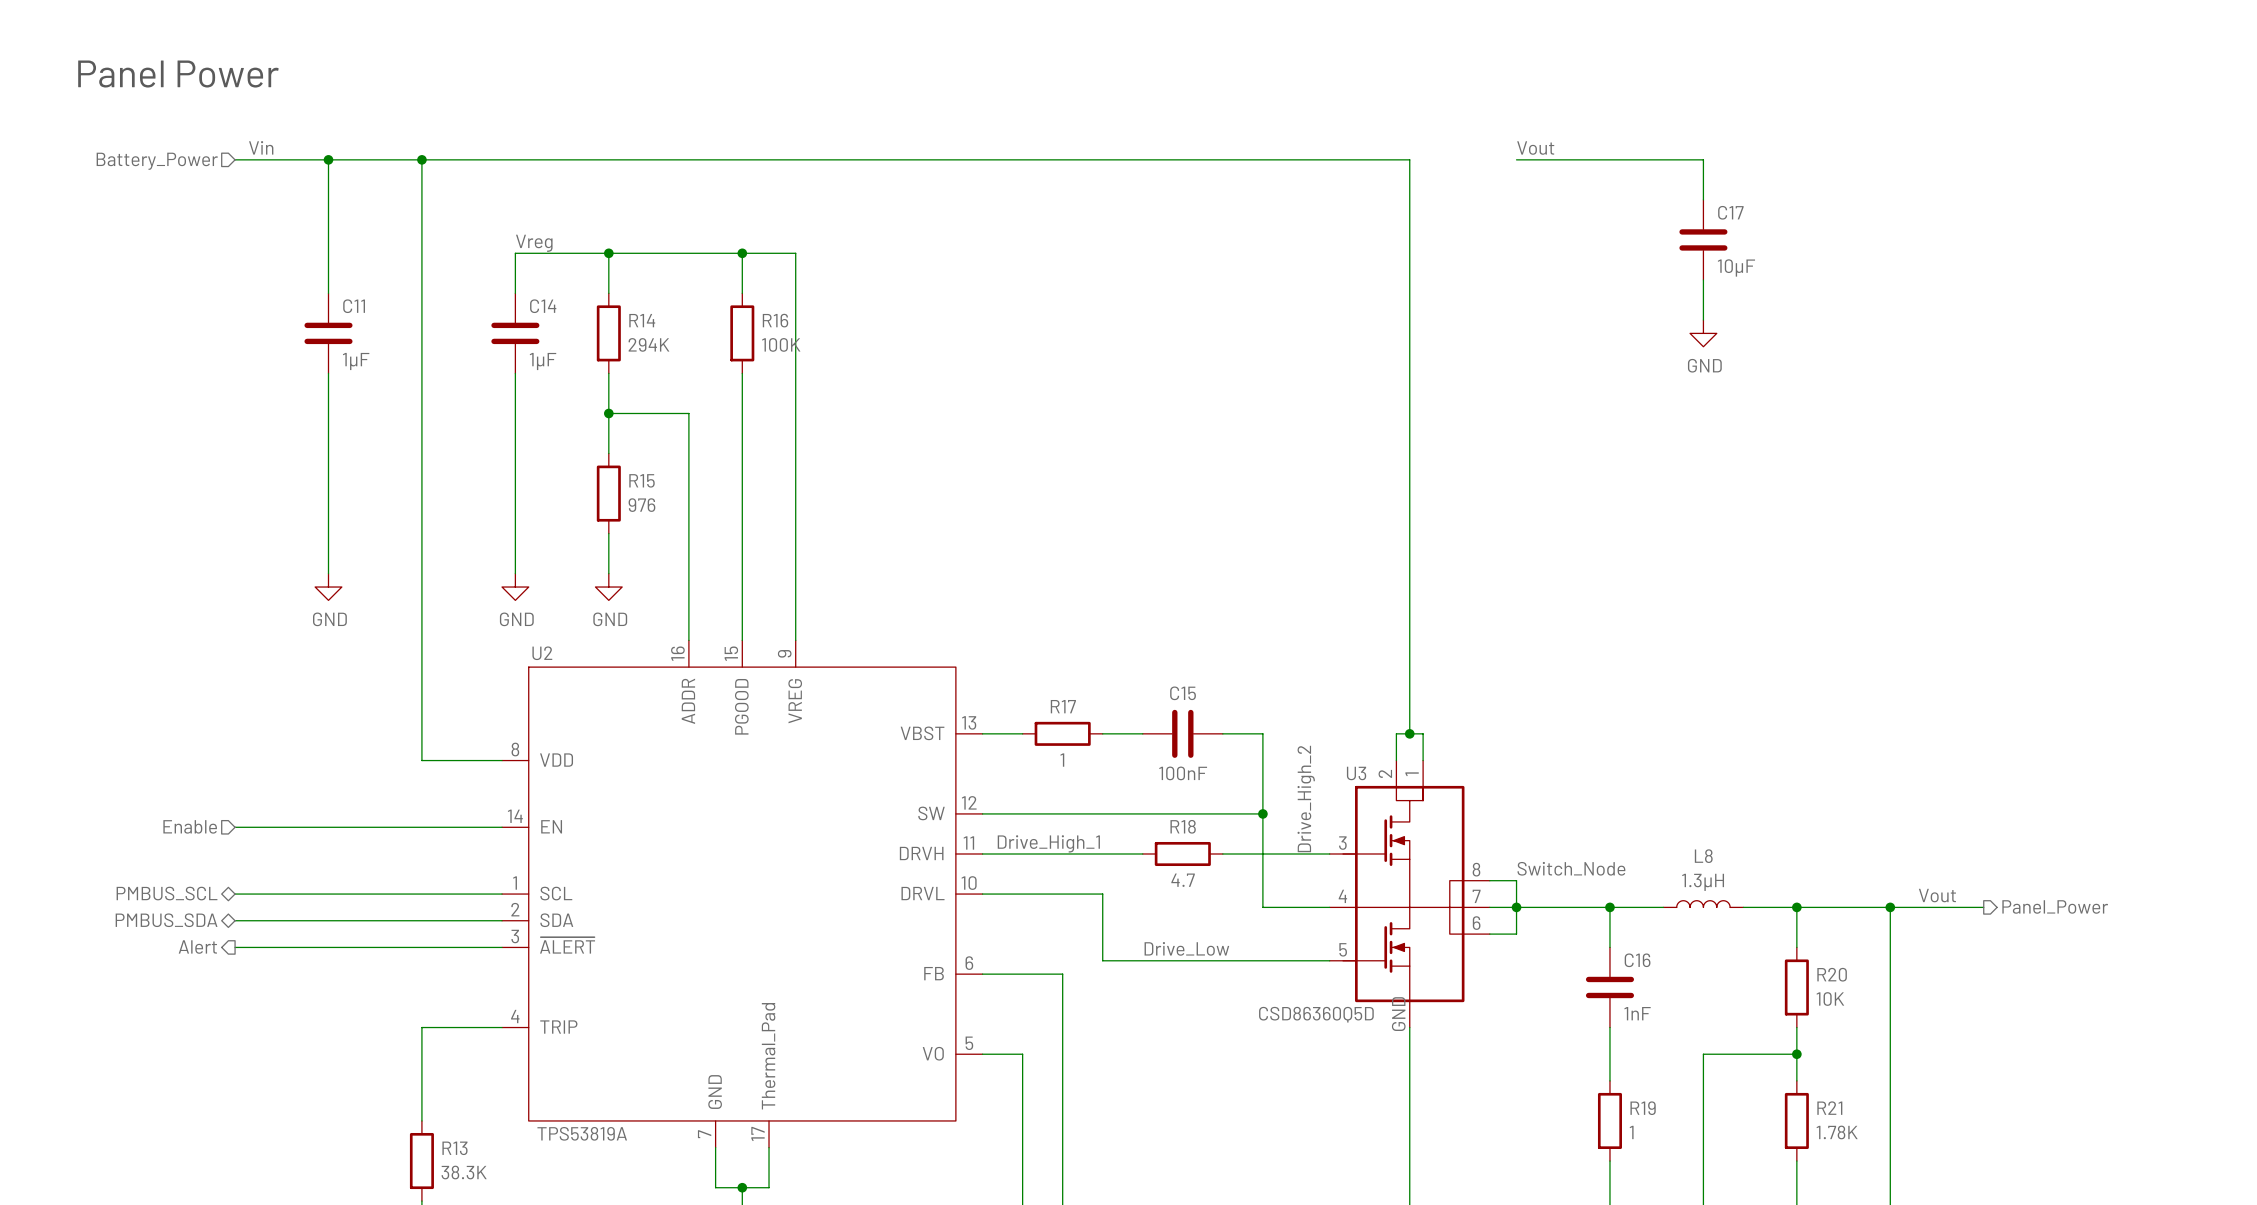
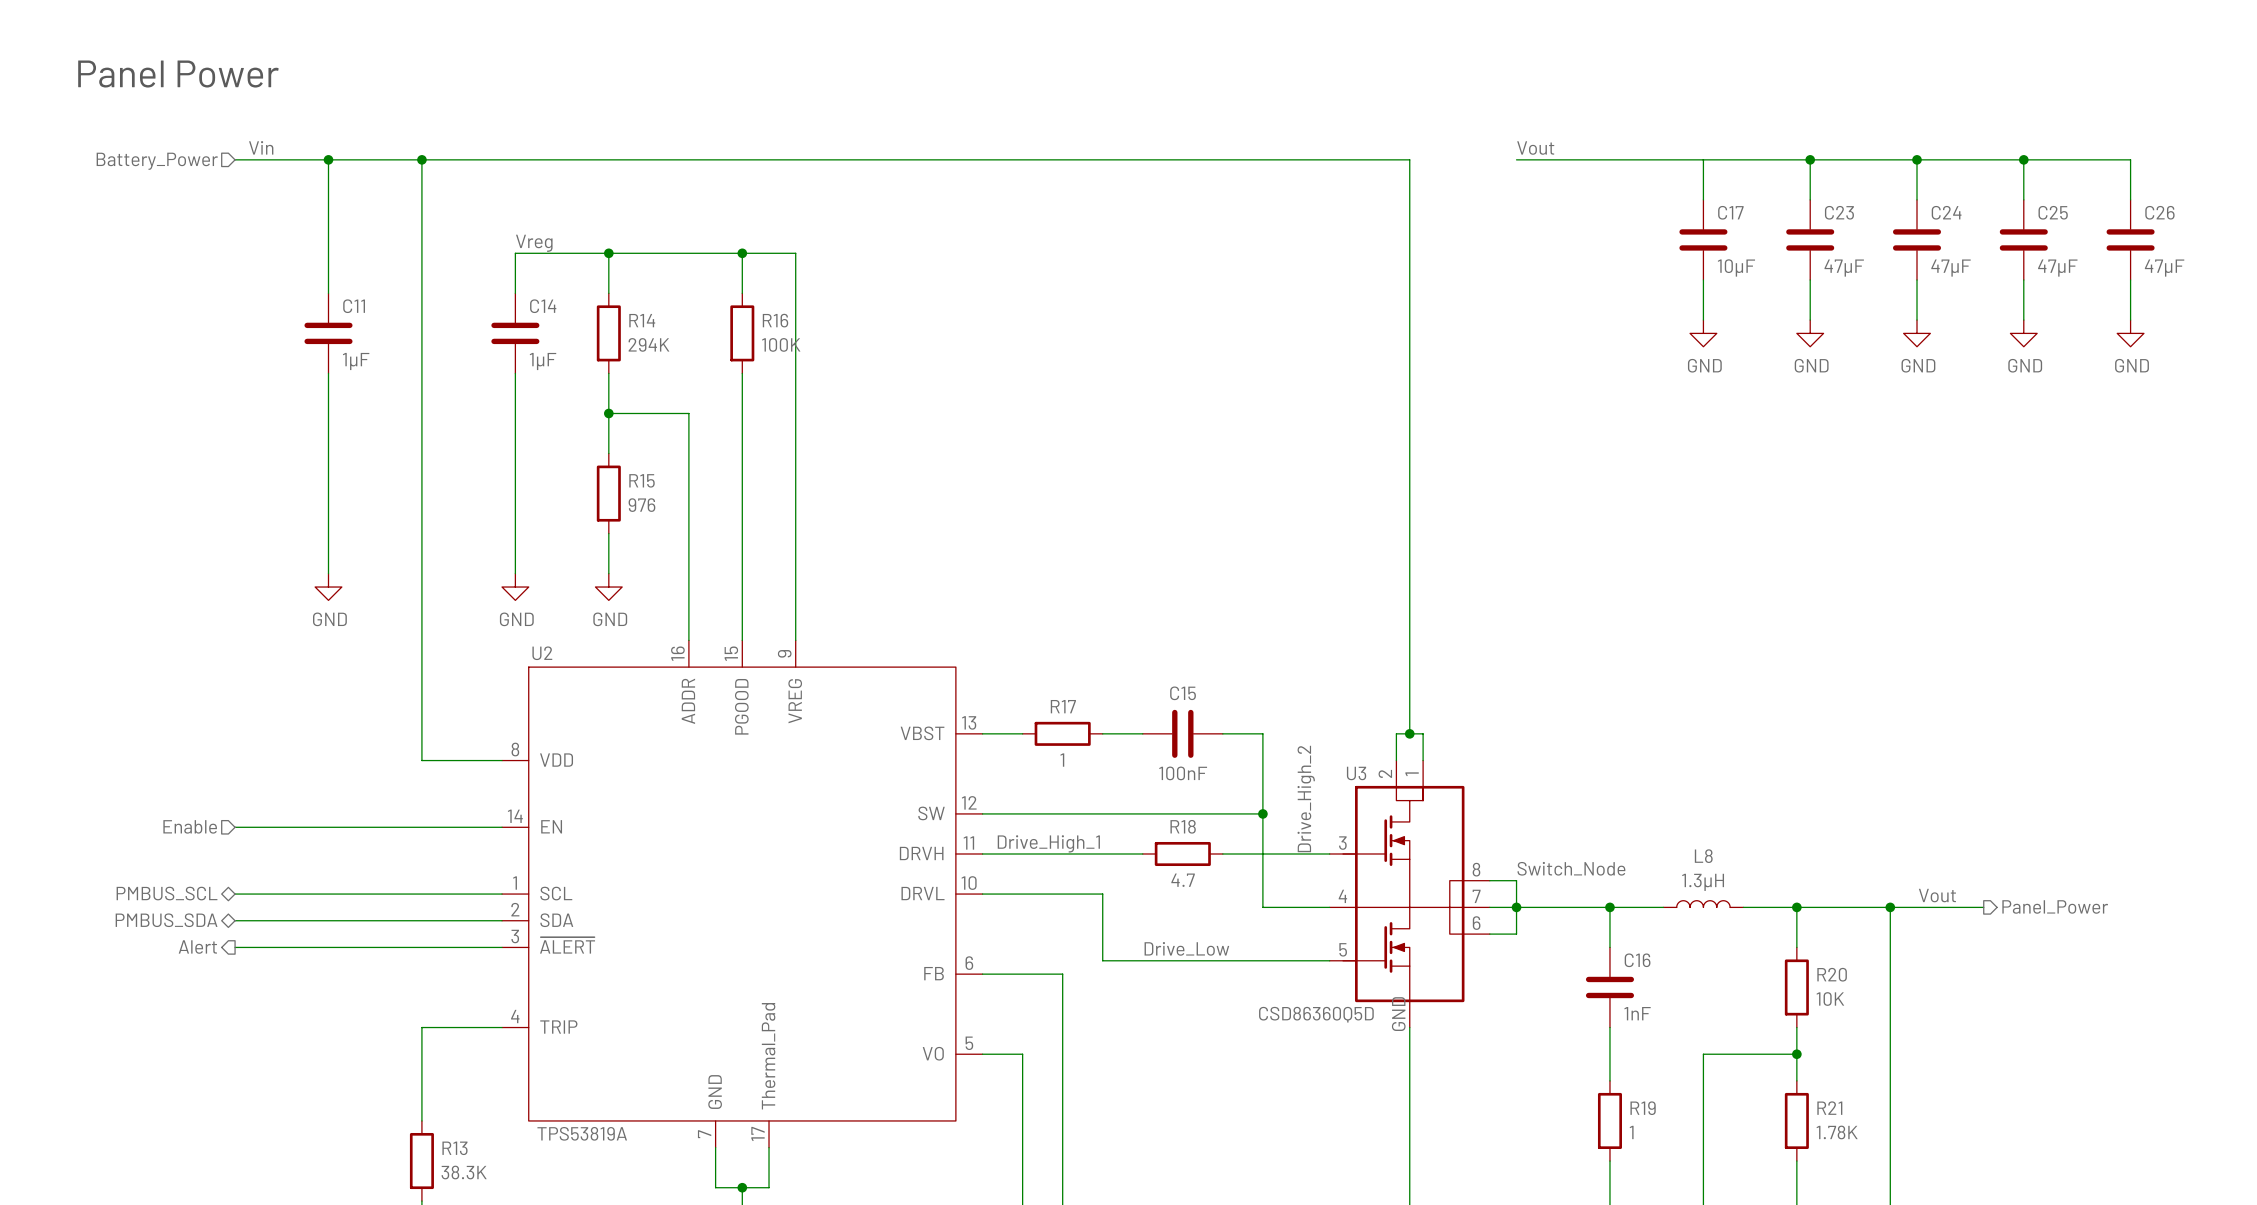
wire: none -> (1703, 159) (2130, 159) (2130, 199)
wire: none -> (1810, 159) (1810, 199)
junction: none -> (1810, 159)
wire: none -> (1917, 159) (1917, 199)
junction: none -> (1917, 159)
wire: none -> (2023, 159) (2023, 199)
junction: none -> (2023, 159)
C23: none -> 47µF (1810, 239)
C24: none -> 47µF (1917, 239)
C25: none -> 47µF (2023, 239)
C26: none -> 47µF (2130, 239)
wire: none -> (1810, 280) (1810, 320)
wire: none -> (1917, 280) (1917, 320)
wire: none -> (2023, 280) (2023, 320)
wire: none -> (2130, 280) (2130, 320)
power symbol: none -> GND (1810, 333)
power symbol: none -> GND (1917, 333)
power symbol: none -> GND (2023, 333)
power symbol: none -> GND (2130, 333)

